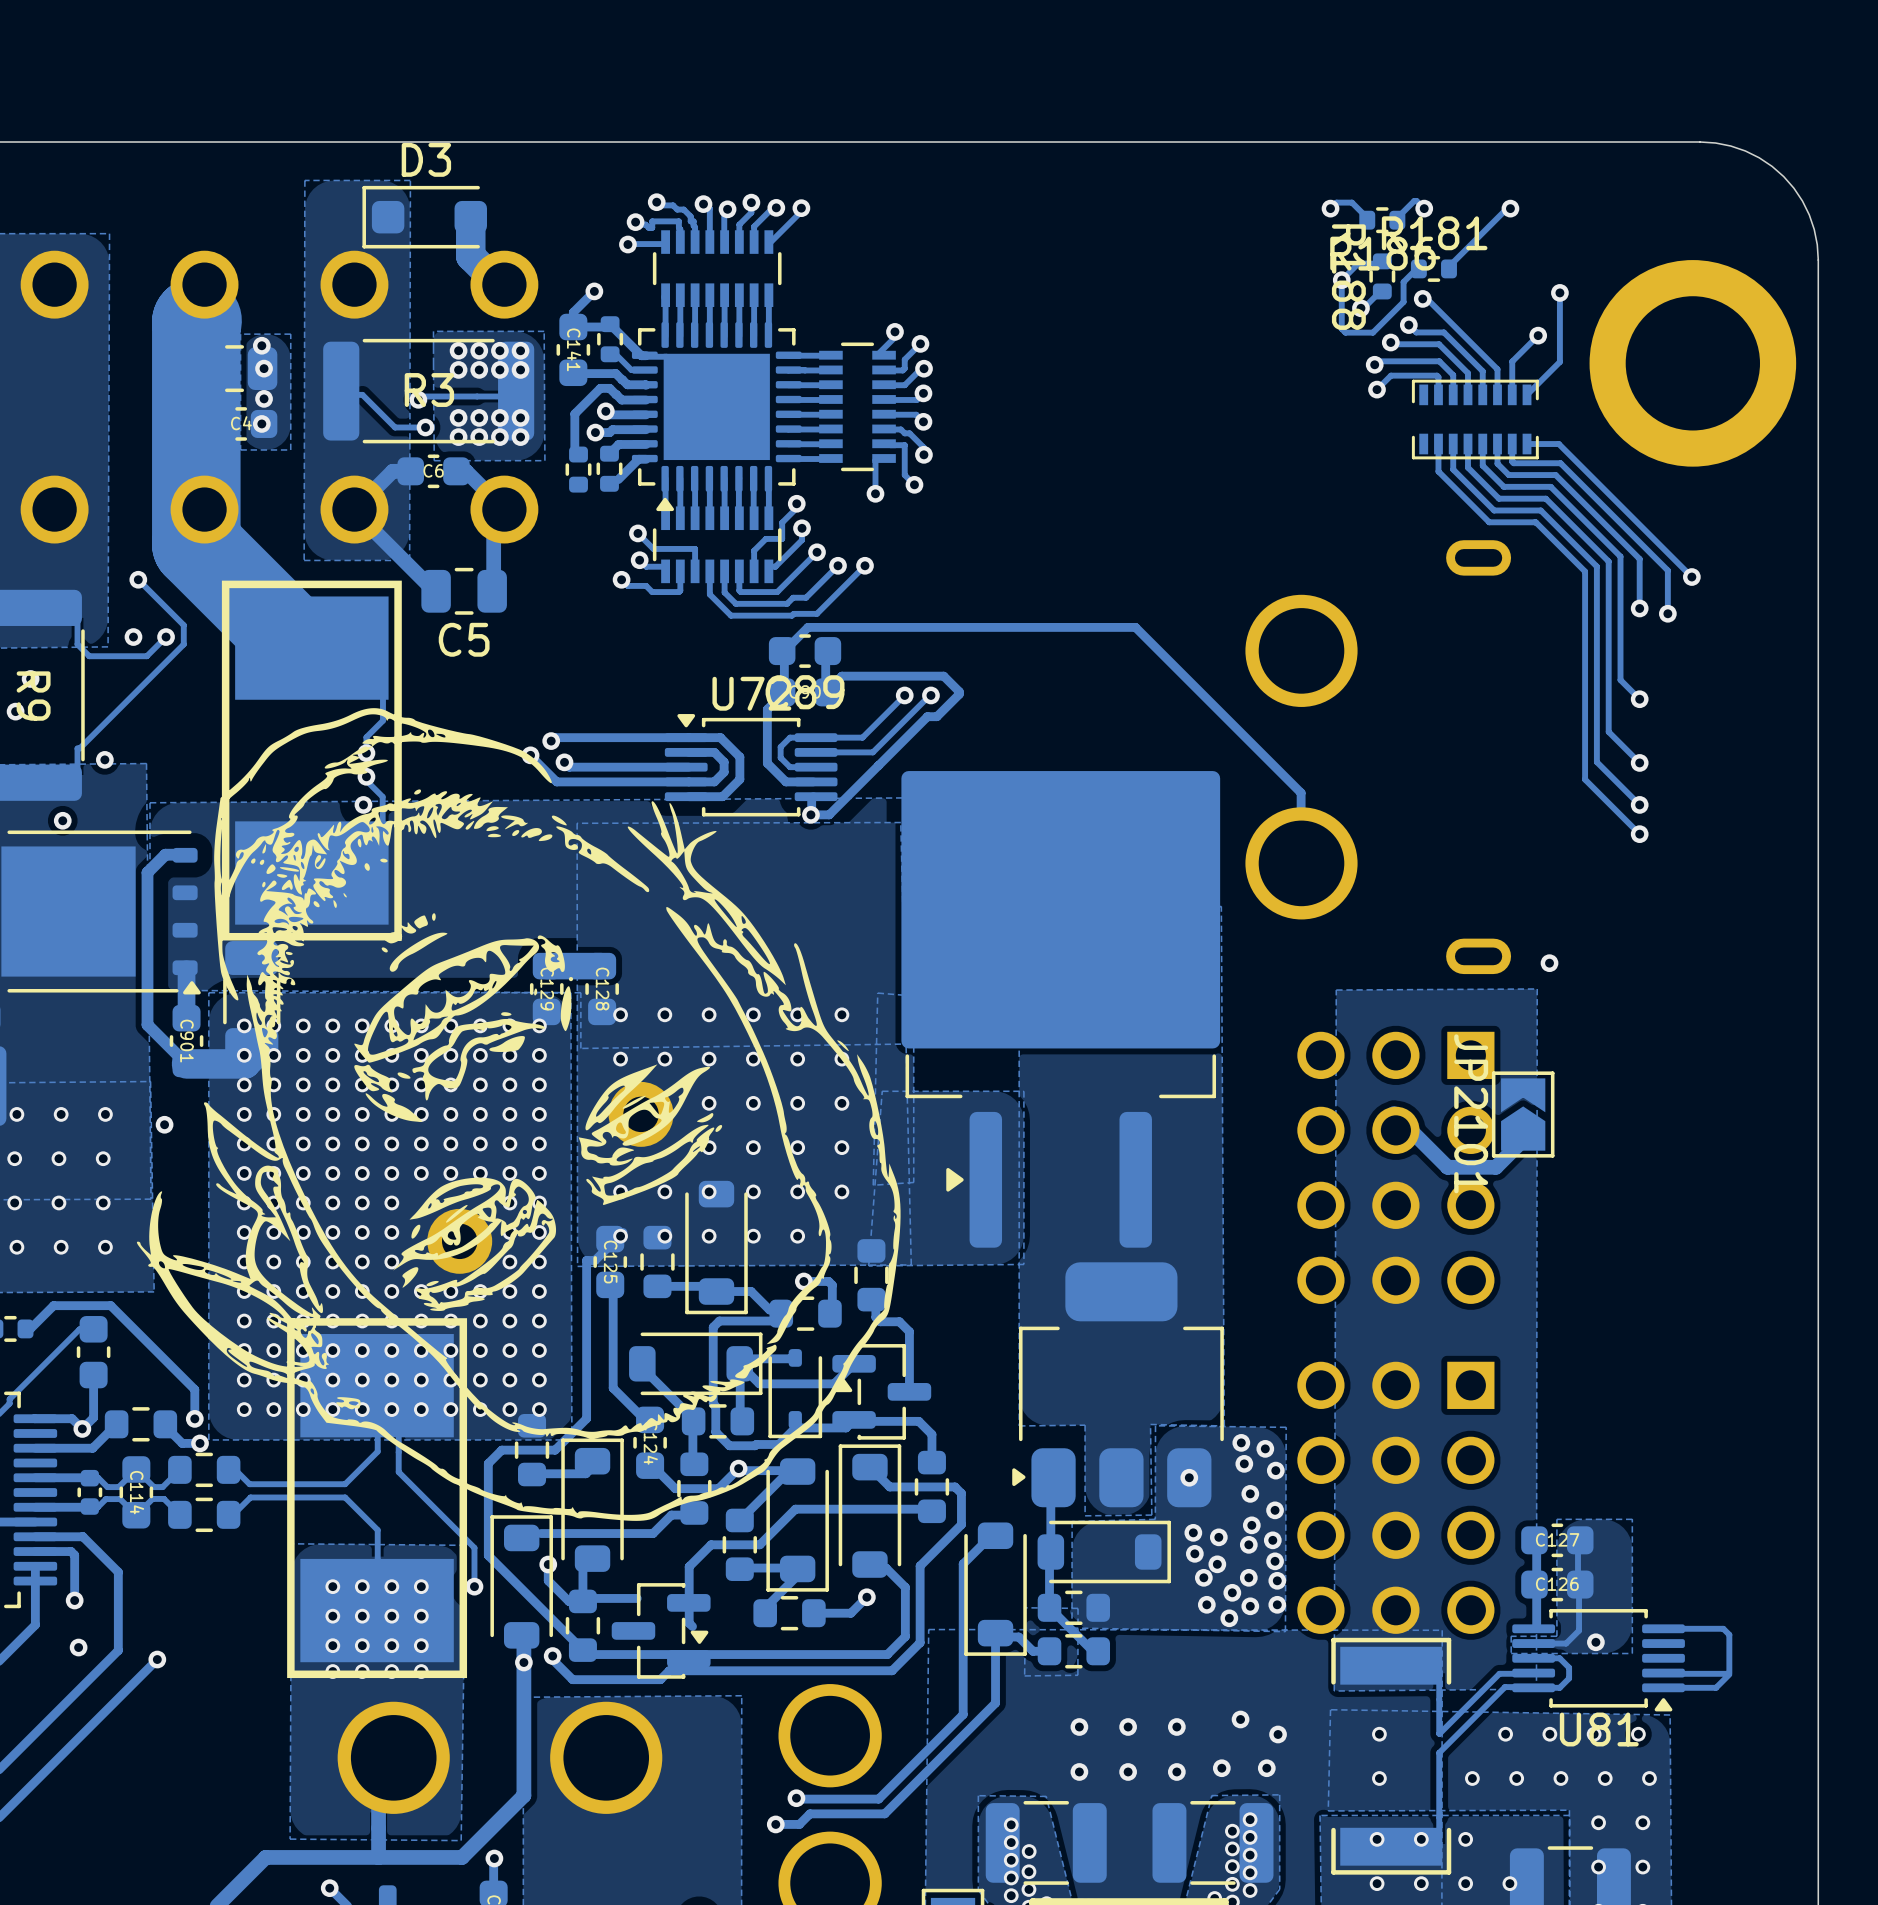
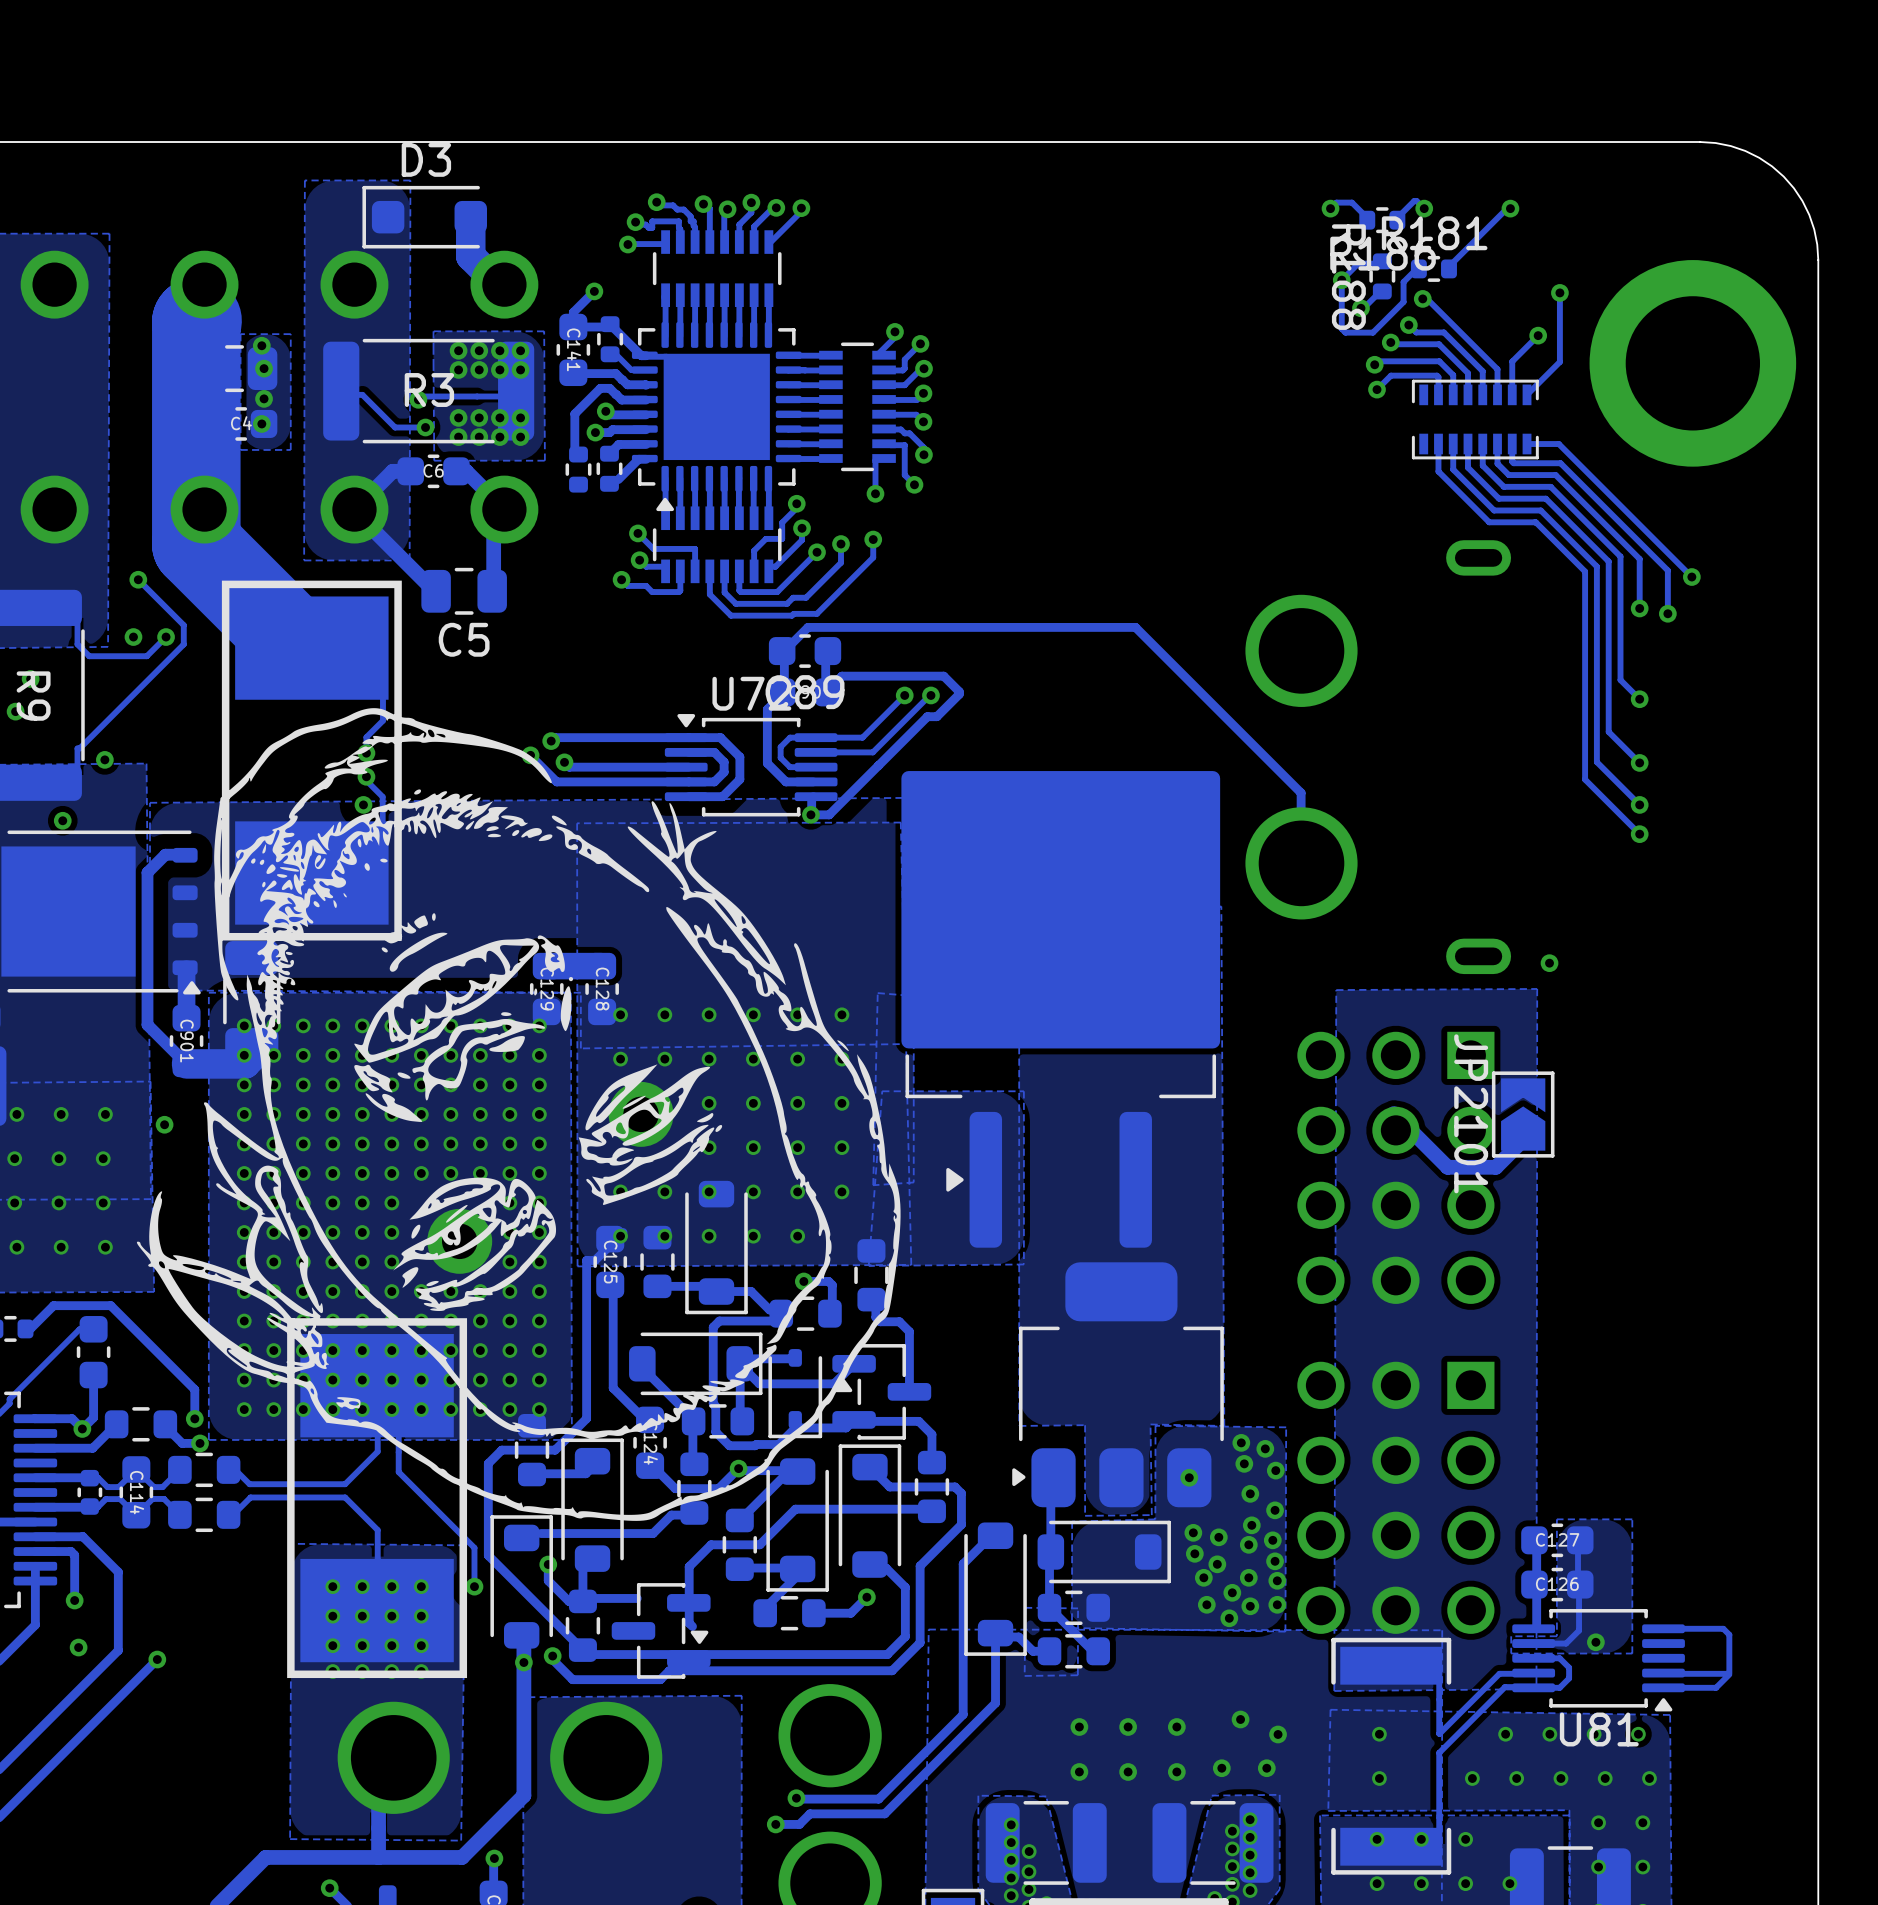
track: none -> (873, 539) (873, 557) (864, 565)
via: none -> (873, 539)
track: none -> (841, 544) (841, 562) (838, 565)
via: none -> (841, 544)
via: (838, 565) -> none
via: (864, 565) -> none

